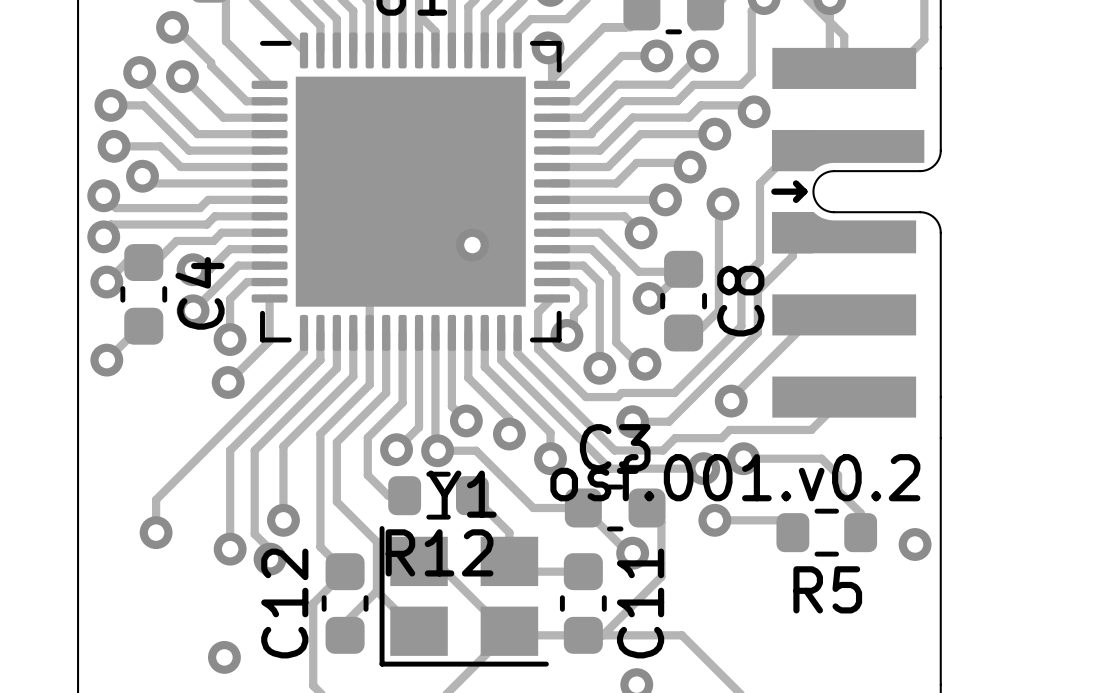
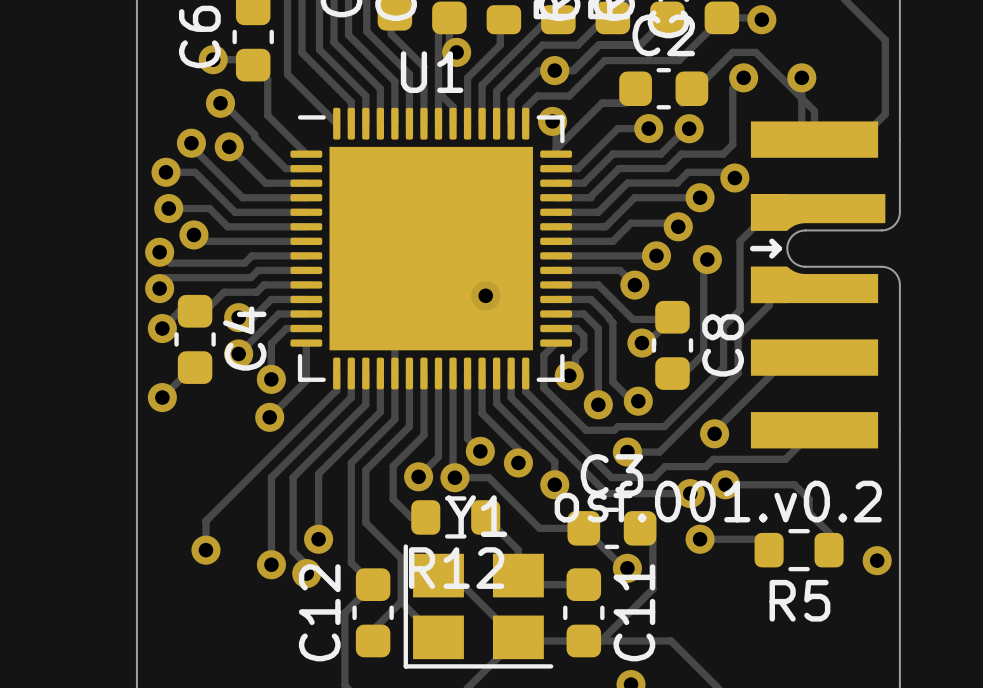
via: (224, 657) -> none

